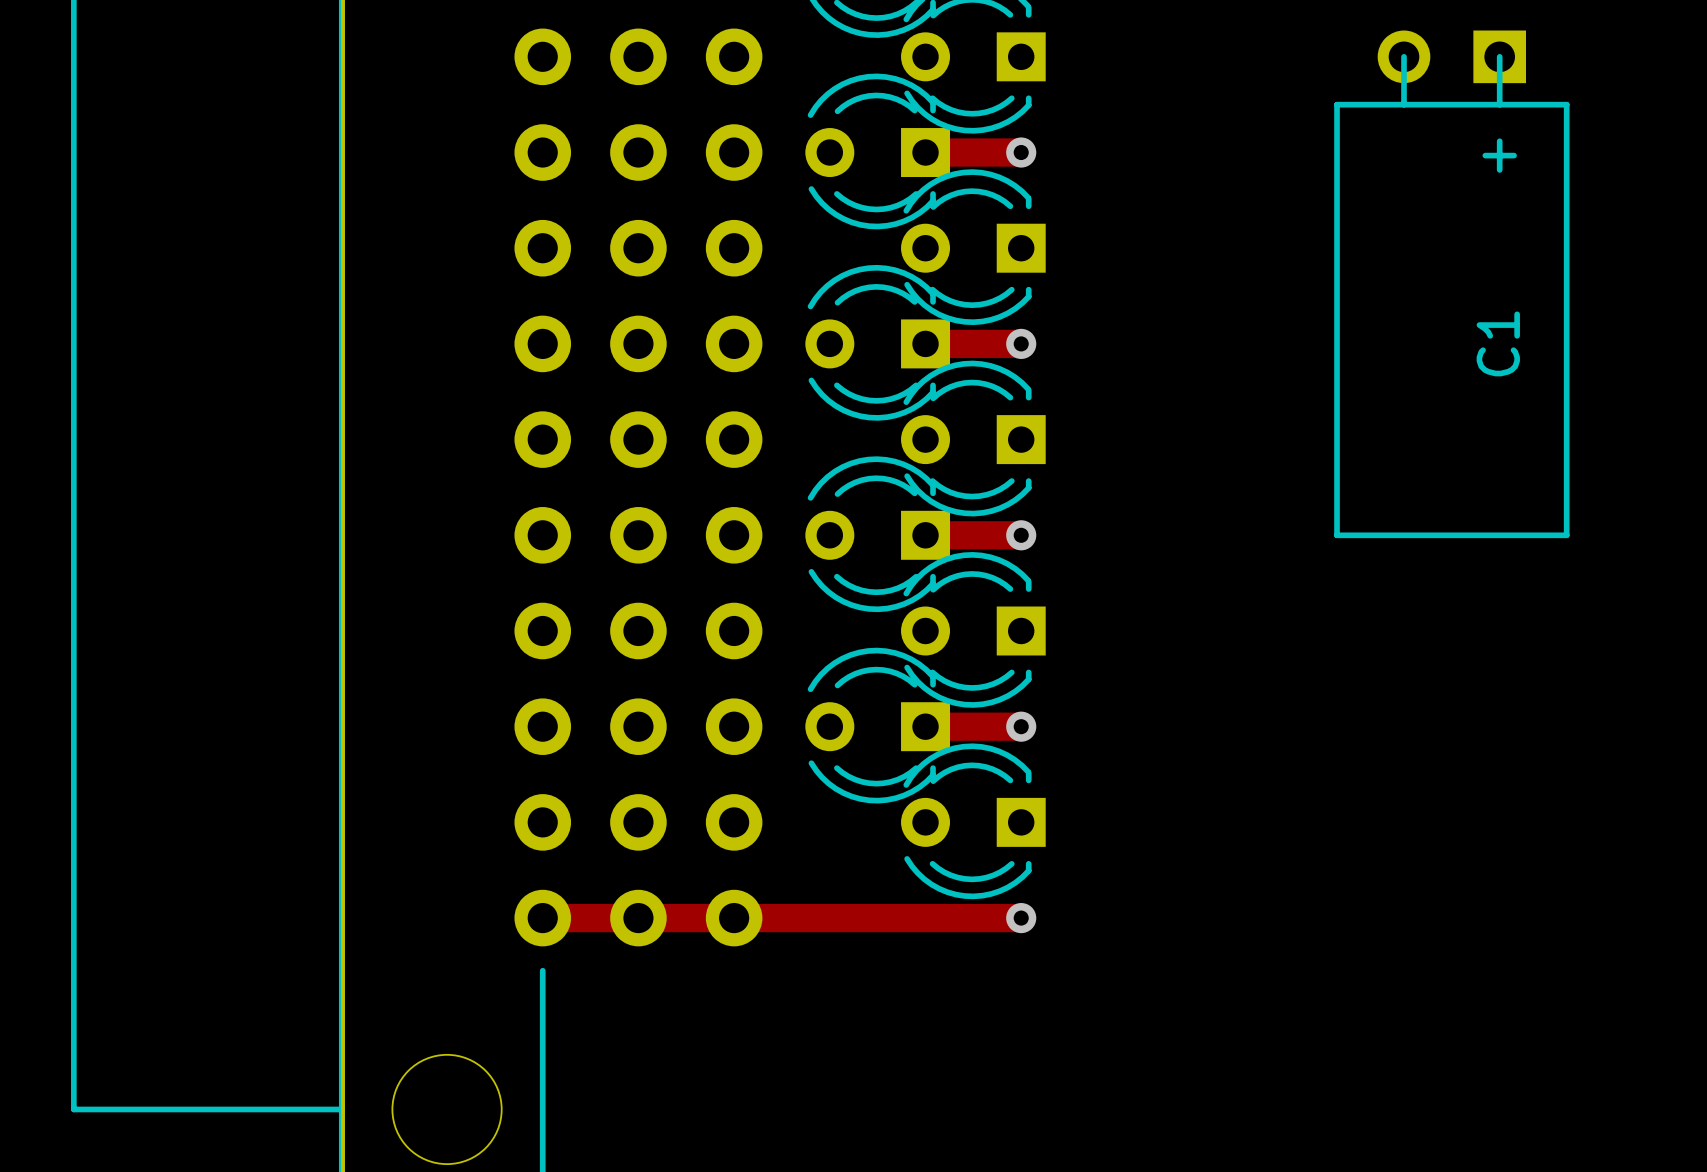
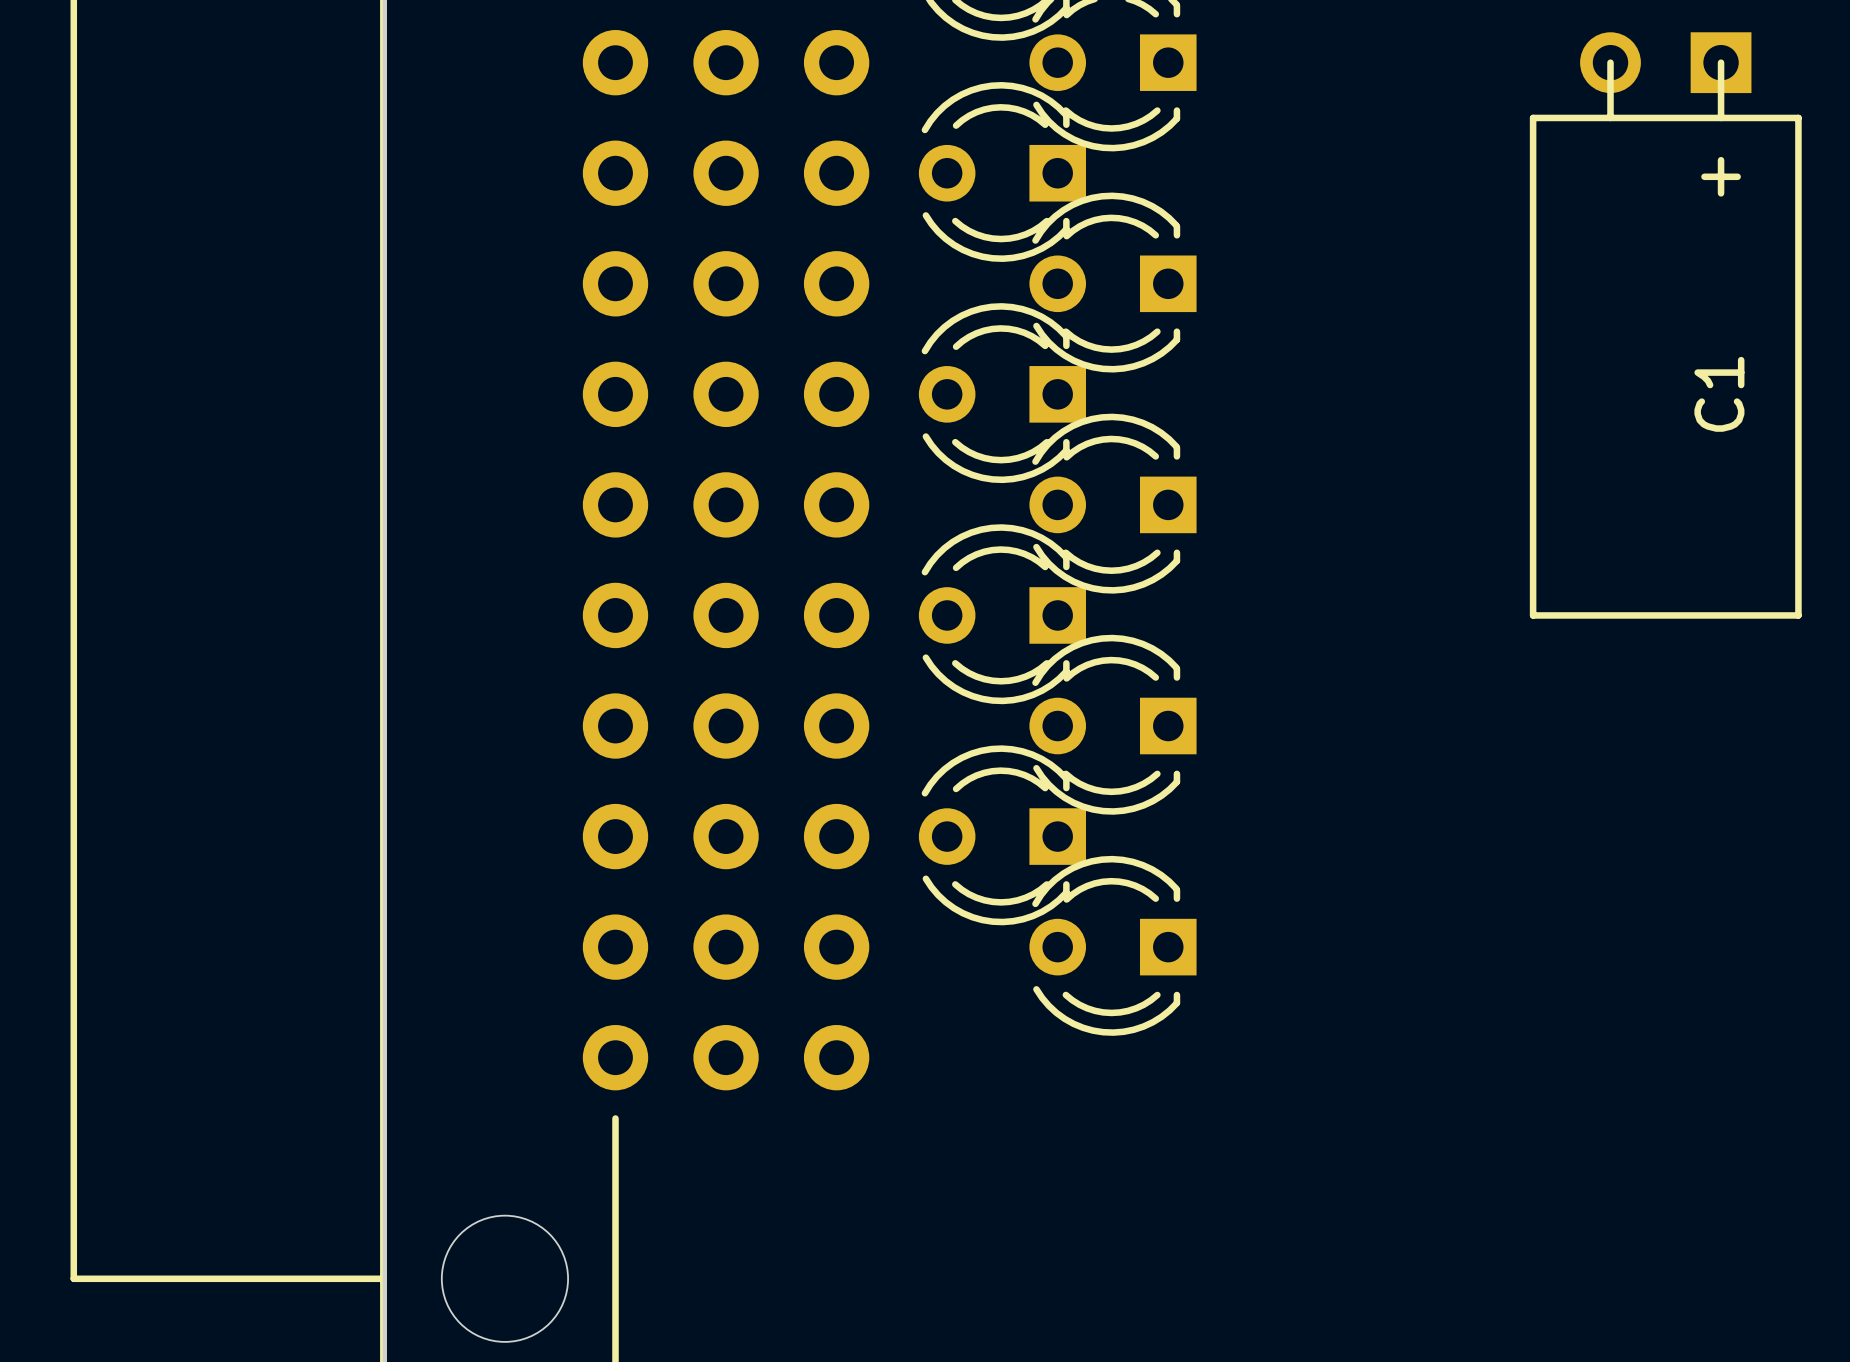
track: (925, 152) (1021, 152) -> none
via: (1021, 152) -> none
track: (925, 343) (1021, 343) -> none
via: (1021, 343) -> none
track: (925, 535) (1021, 535) -> none
via: (1021, 535) -> none
track: (925, 726) (1021, 726) -> none
via: (1021, 726) -> none
track: (542, 918) (1021, 918) -> none
via: (1021, 918) -> none

